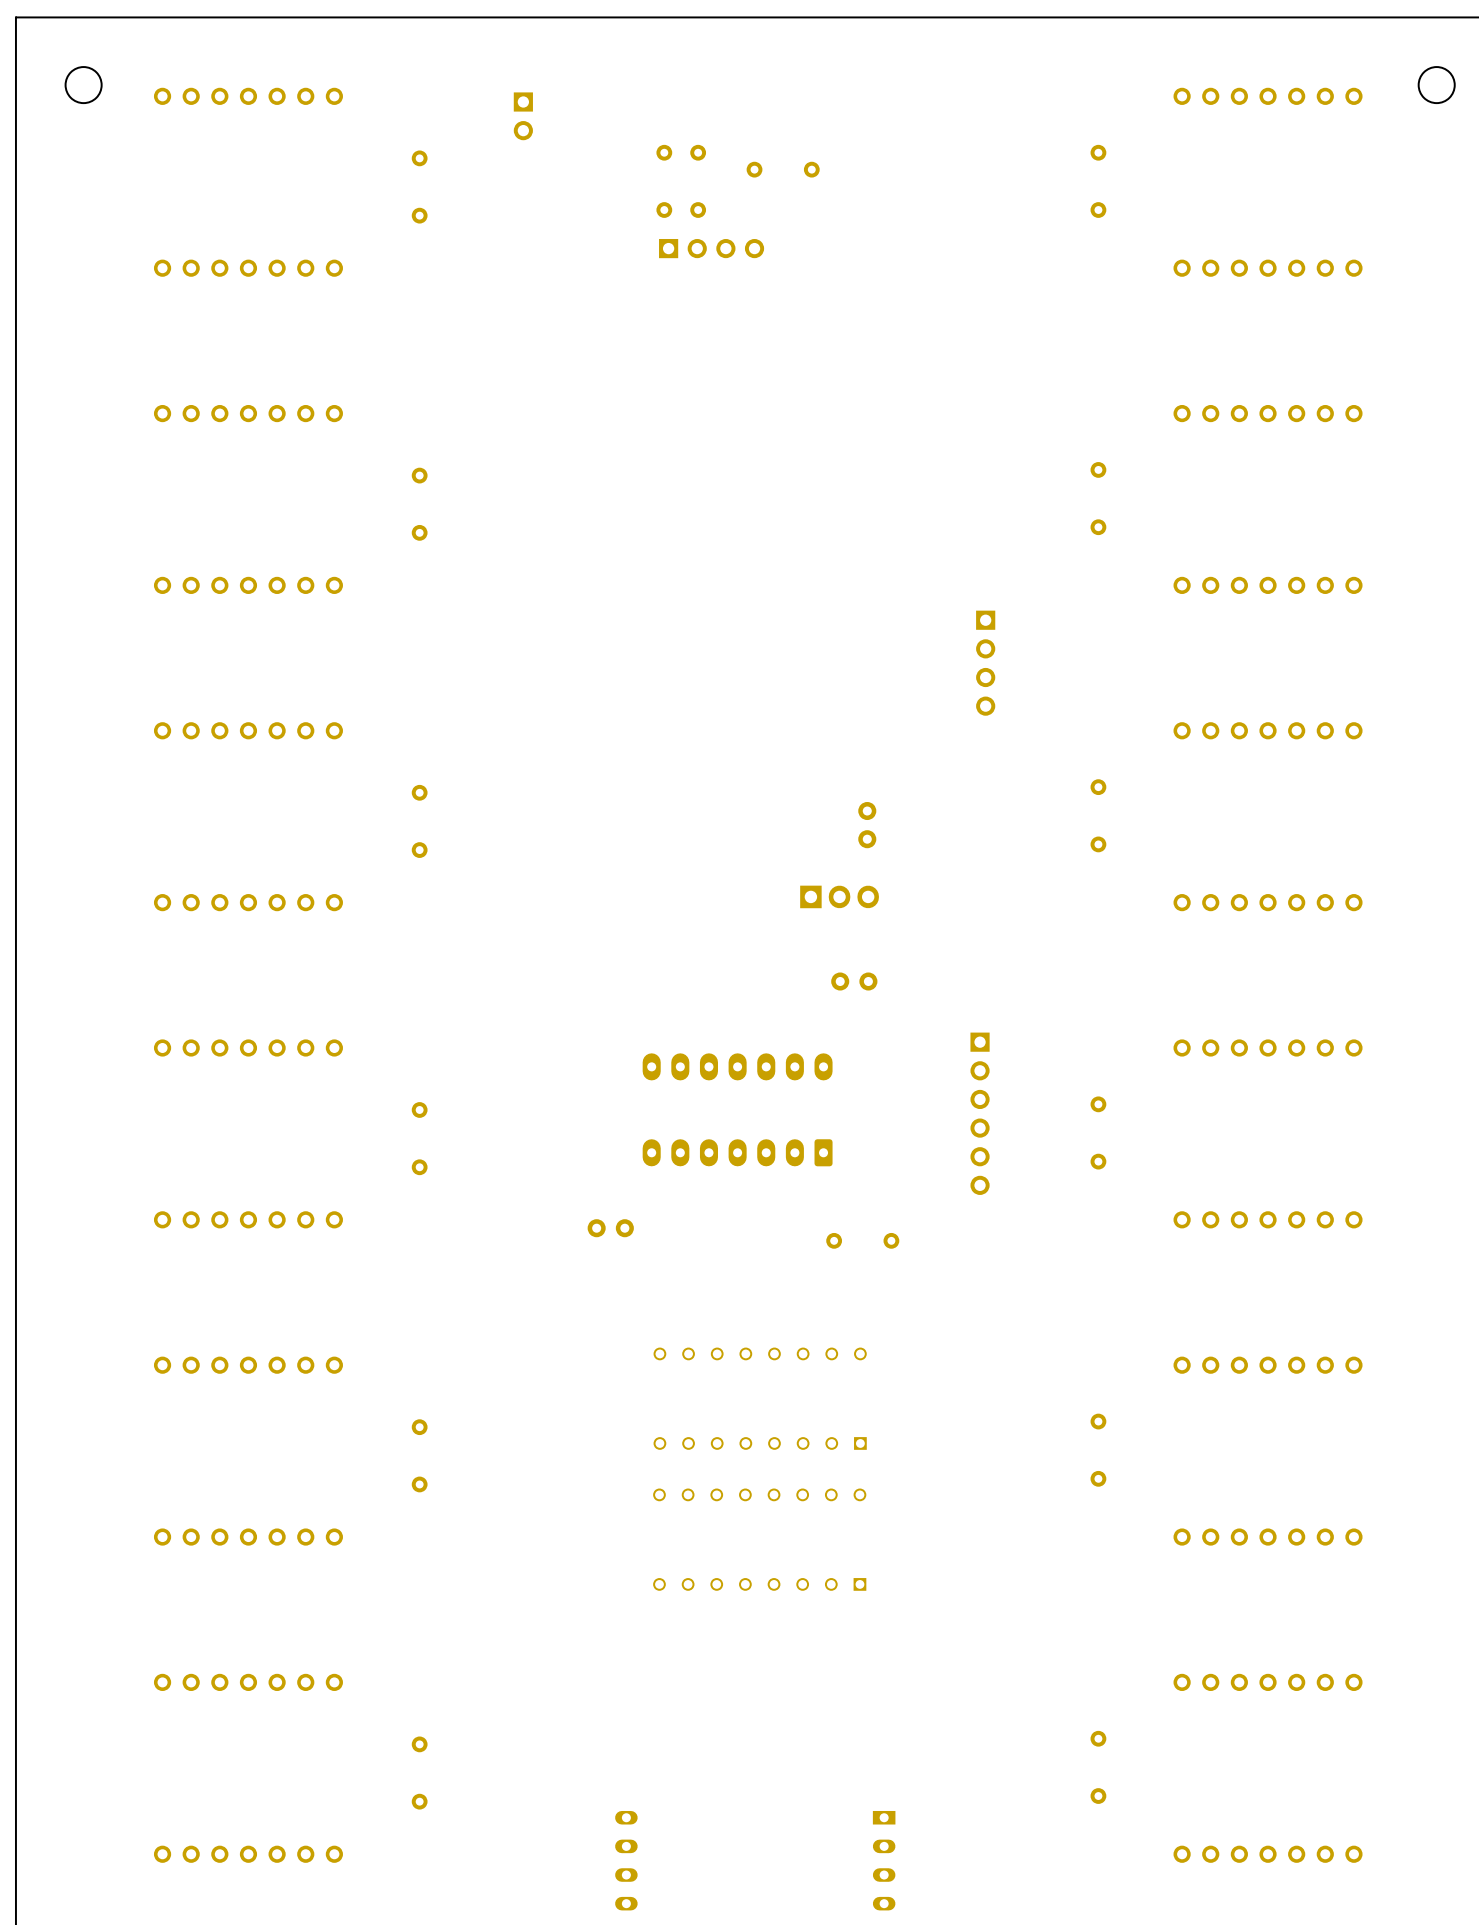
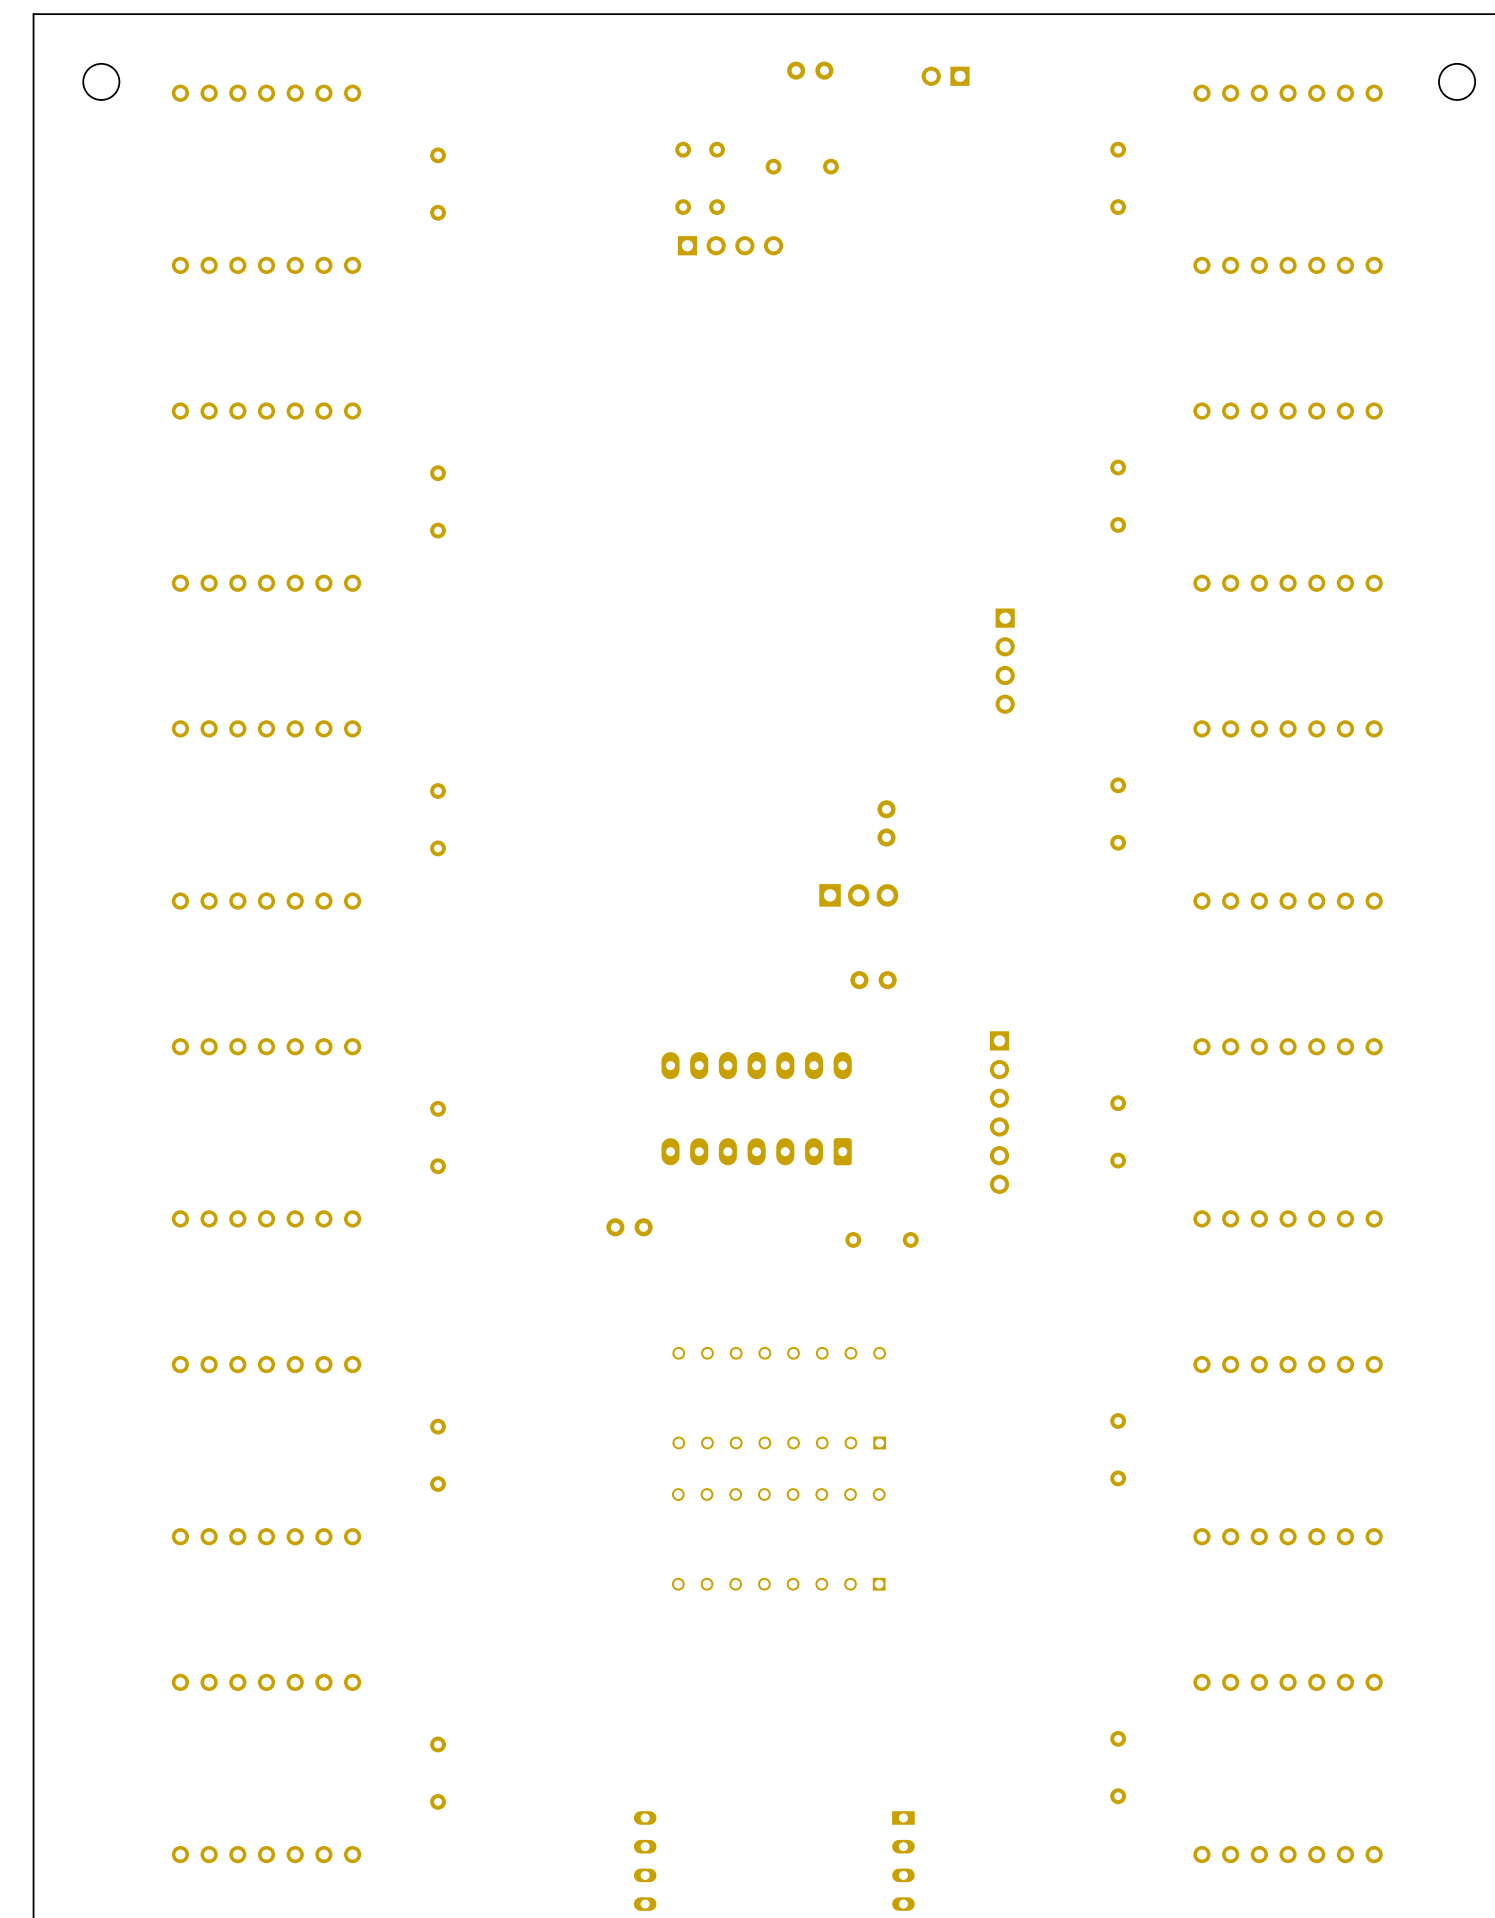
part: none -> (810, 70)
part: none -> (945, 76)
part: (523, 116) -> none

